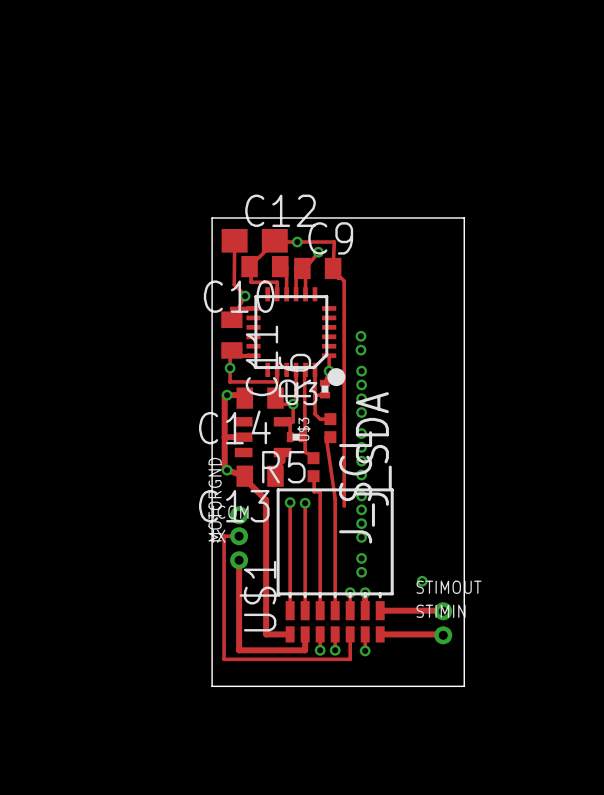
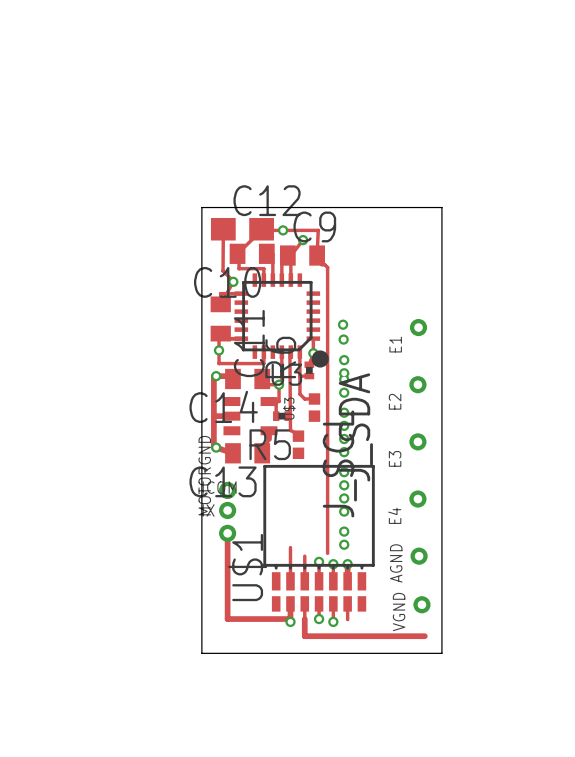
via: (360, 336) -> none
via: none -> (343, 324)
E1: none -> (418, 327)
via: (360, 350) -> none
via: none -> (343, 339)
via: (361, 371) -> none
via: none -> (344, 360)
via: (361, 384) -> none
via: none -> (344, 373)
E2: none -> (417, 384)
track: (330, 437) (326, 437) (335, 498) (335, 590) -> none
E3: none -> (417, 441)
track: (244, 476) (244, 478) (266, 500) (266, 634) (290, 634) -> none
track: (313, 476) (314, 491) (320, 491) (320, 584) -> none
track: (290, 502) (290, 610) -> none
via: (290, 502) -> none
track: (305, 503) (305, 575) -> none
via: (305, 503) -> none
track: none -> (327, 481) (327, 553)
E4: none -> (417, 499)
track: (239, 536) (224, 536) (224, 659) (350, 659) (350, 653) -> none
via: (422, 581) -> none
AGND: none -> (419, 556)
via: none -> (319, 561)
track: (380, 610) (443, 611) -> none
STIMIN name: STIMIN (441, 611) -> VGND (399, 612)
STIMOUT: (443, 611) -> none
track: (380, 634) (443, 635) -> none
track: none -> (304, 619) (304, 636) (424, 636)
via: (320, 650) -> none
via: (365, 650) -> none
via: none -> (290, 621)
via: none -> (333, 621)

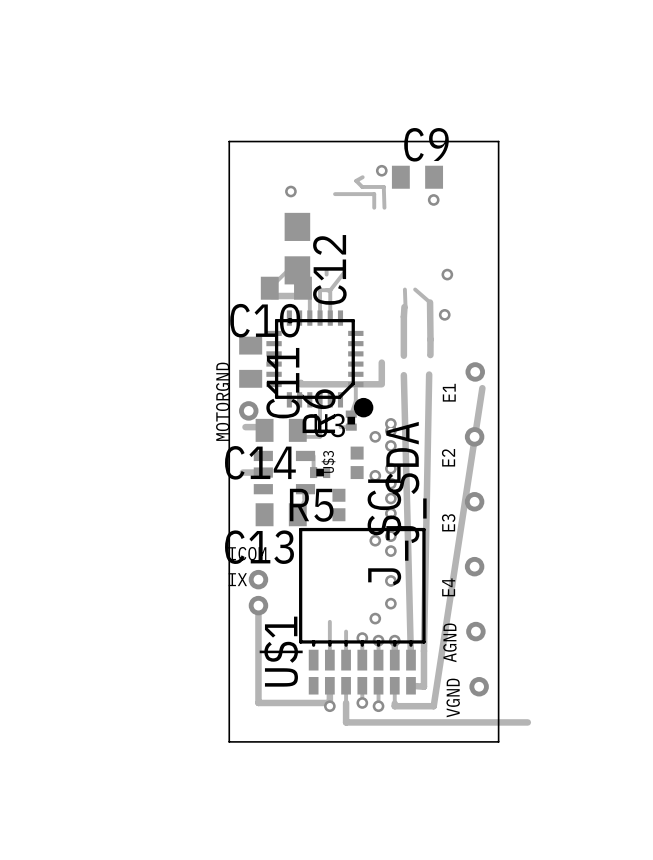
via: none -> (381, 170)
track: none -> (362, 177) (356, 180) (362, 186) (383, 186) (384, 207)
via: none -> (290, 191)
track: none -> (335, 194) (374, 194) (374, 207)
via: none -> (433, 199)
board edge: (201, 207) (441, 207) (441, 653) (439, 653) -> (229, 235) (229, 141) (498, 141) (498, 741)
track: (223, 229) (223, 270) (233, 281) (220, 304) (220, 293) (241, 293) -> none
C12 rotation: 0° (242, 229) -> 90° clockwise (297, 248)
track: (261, 229) (318, 230) (317, 255) (321, 255) (321, 264) (327, 267) (327, 553) -> none
via: (283, 230) -> none
track: none -> (326, 270) (326, 274)
via: (303, 240) -> none
via: none -> (447, 274)
track: none -> (404, 289) (403, 355)
track: none -> (415, 289) (430, 302) (429, 355)
C9 position: (302, 255) -> (417, 177)
track: (239, 257) (237, 253) (239, 268) (263, 268) (263, 280) -> none
track: none -> (271, 296) (294, 296)
via: none -> (444, 314)
via: (233, 281) -> none
track: none -> (381, 362) (381, 384) (300, 384) (301, 381)
via: (343, 324) -> none
track: none -> (429, 374) (423, 686) (410, 685)
track: none -> (403, 375) (410, 660)
track: (220, 333) (220, 338) (241, 338) (219, 338) (219, 363) (263, 363) (263, 352) -> none
via: (343, 339) -> none
track: none -> (482, 388) (433, 706) (394, 706) (394, 703)
via: (219, 350) -> none
track: (290, 352) (290, 430) (298, 436) -> none
track: (299, 352) (299, 394) (304, 399) (314, 399) -> none
via: (313, 353) -> none
via: (344, 360) -> none
via: (216, 376) -> none
track: (216, 377) (213, 376) (213, 447) (232, 453) -> none
track: (279, 384) (279, 401) (269, 401) -> none
via: (279, 384) -> none
via: none -> (375, 436)
via: none -> (375, 475)
via: (216, 447) -> none
via: none -> (375, 540)
MOTORGND position: (227, 490) -> (248, 410)
via: (344, 498) -> none
via position: (344, 544) -> (375, 618)
track: none -> (482, 722) (527, 722)

